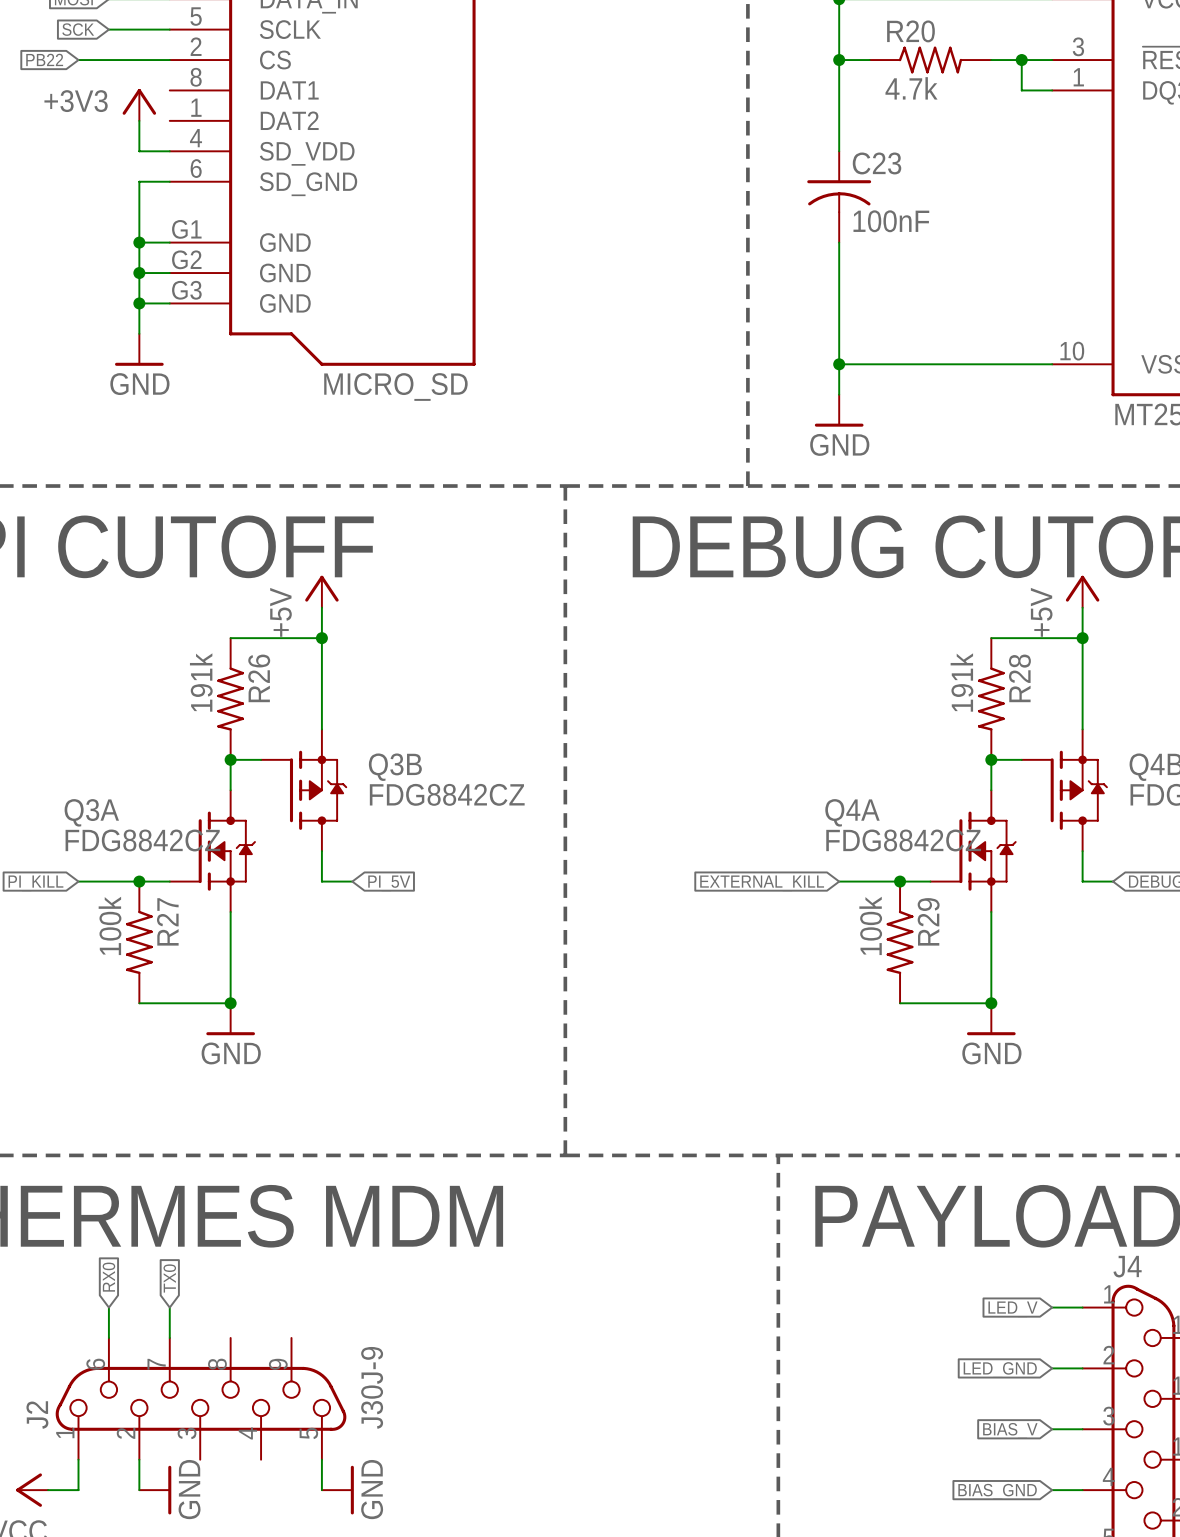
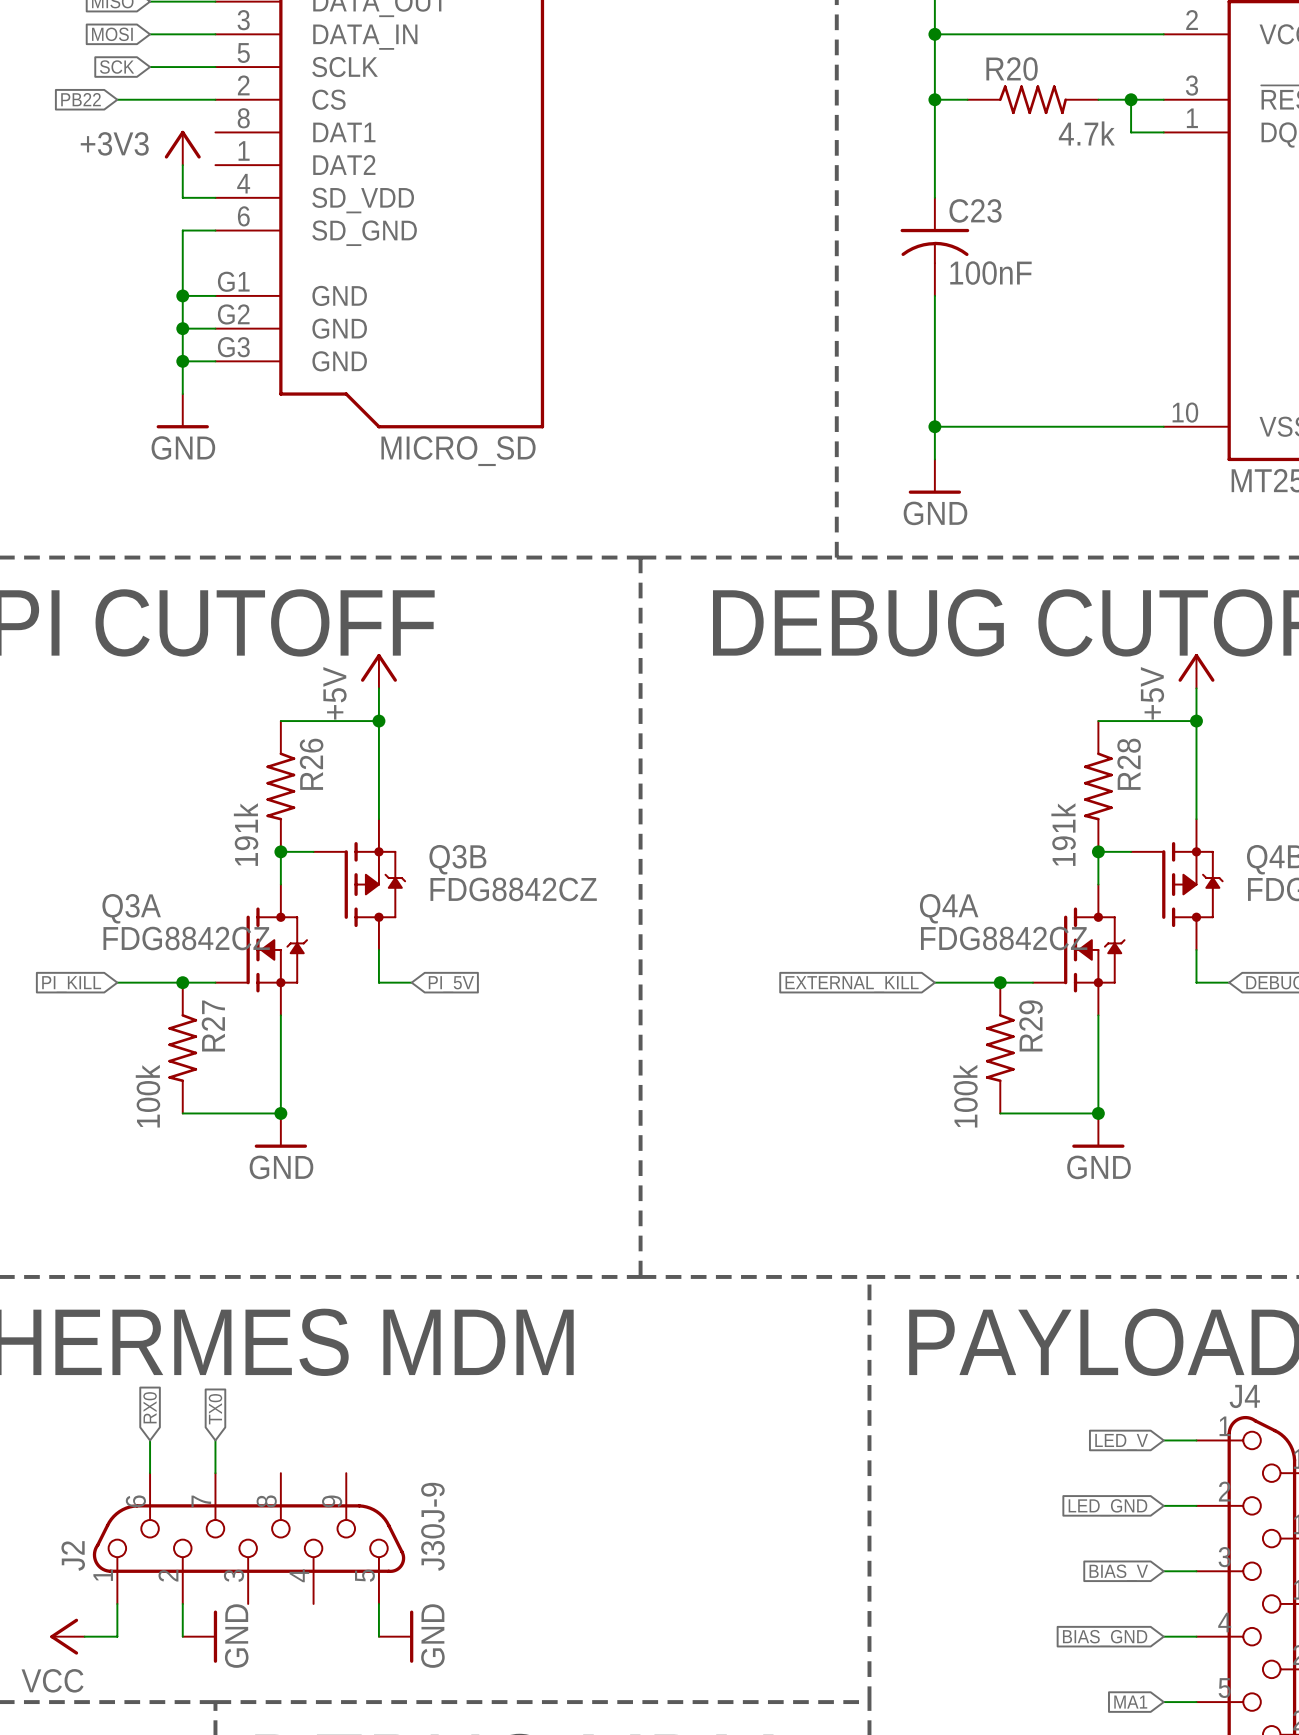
R20 value position: 4.7k (911, 88) -> 4.7k (1086, 133)
R26 value position: 191k (201, 682) -> 191k (246, 834)
R28 value position: 191k (962, 682) -> 191k (1063, 834)
R27 value position: 100k (110, 925) -> 100k (147, 1096)
R29 value position: 100k (870, 925) -> 100k (965, 1096)

